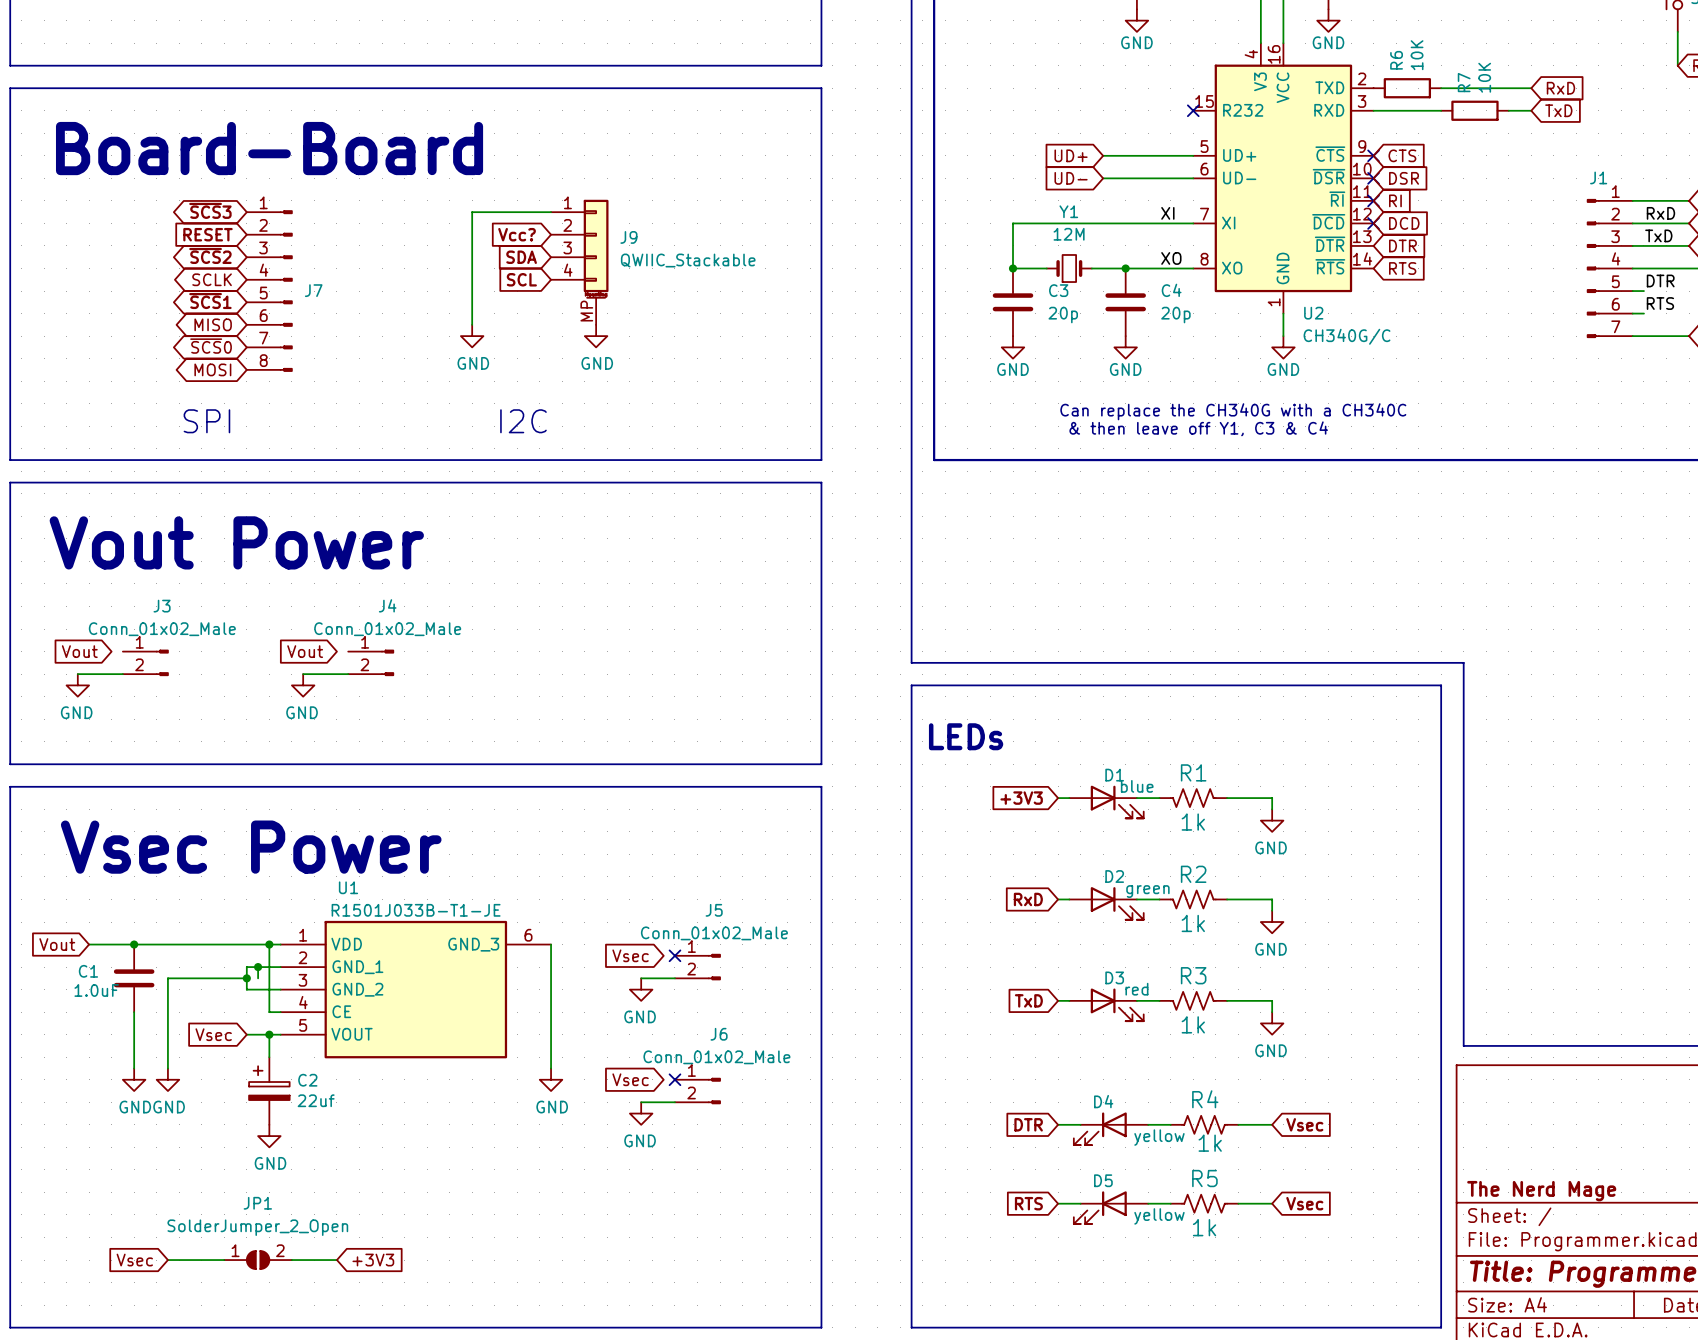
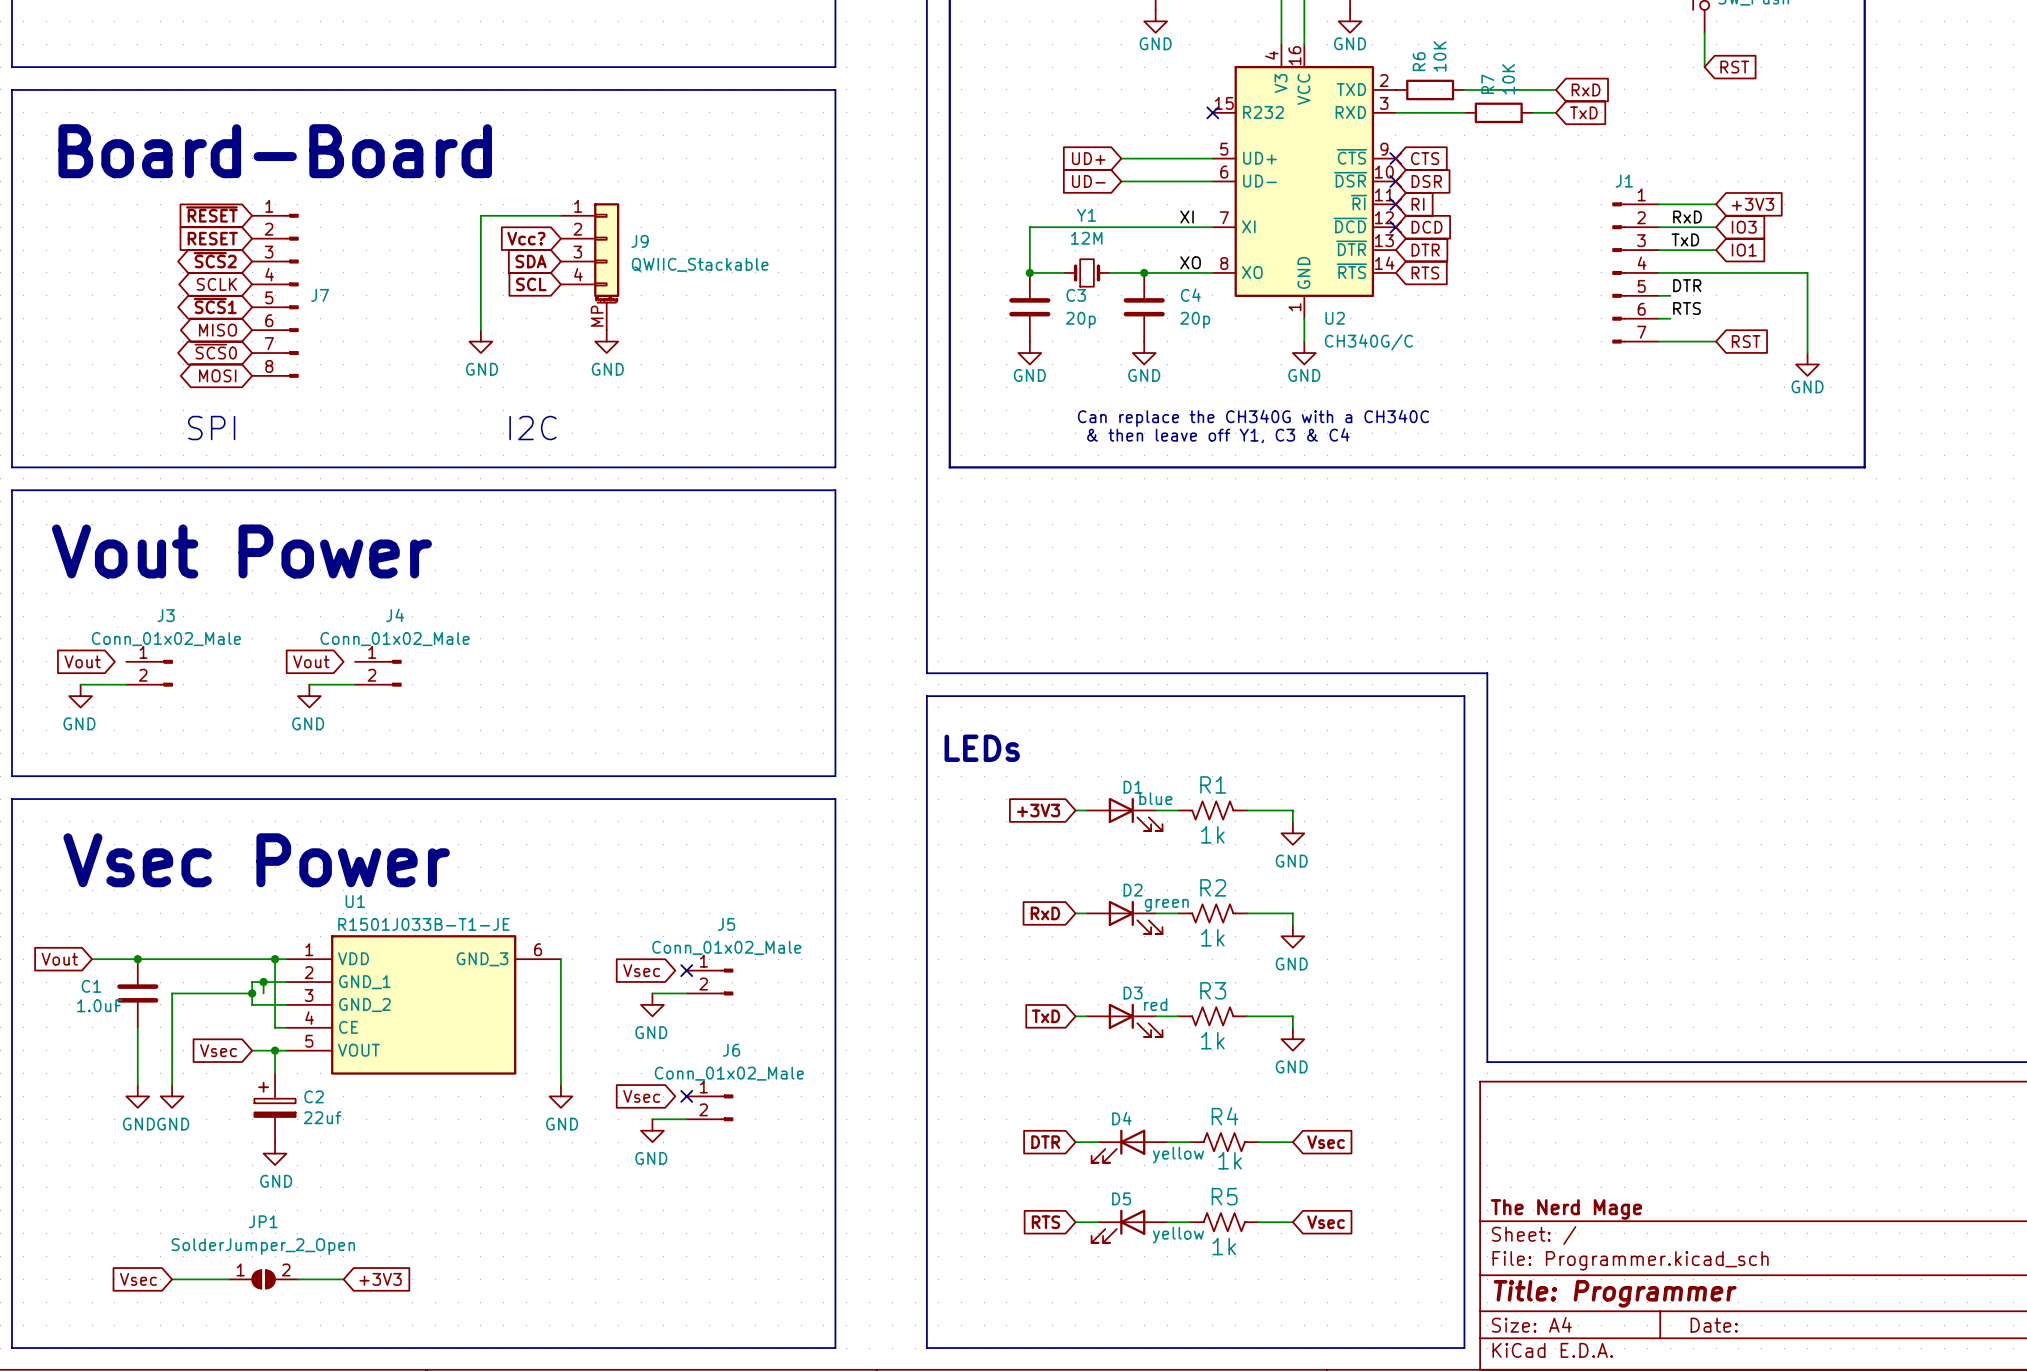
global label shape: bidirectional (210, 210) -> input (211, 214)
global label: ~{SCS}3 (210, 210) -> ~{RESET} (211, 214)

